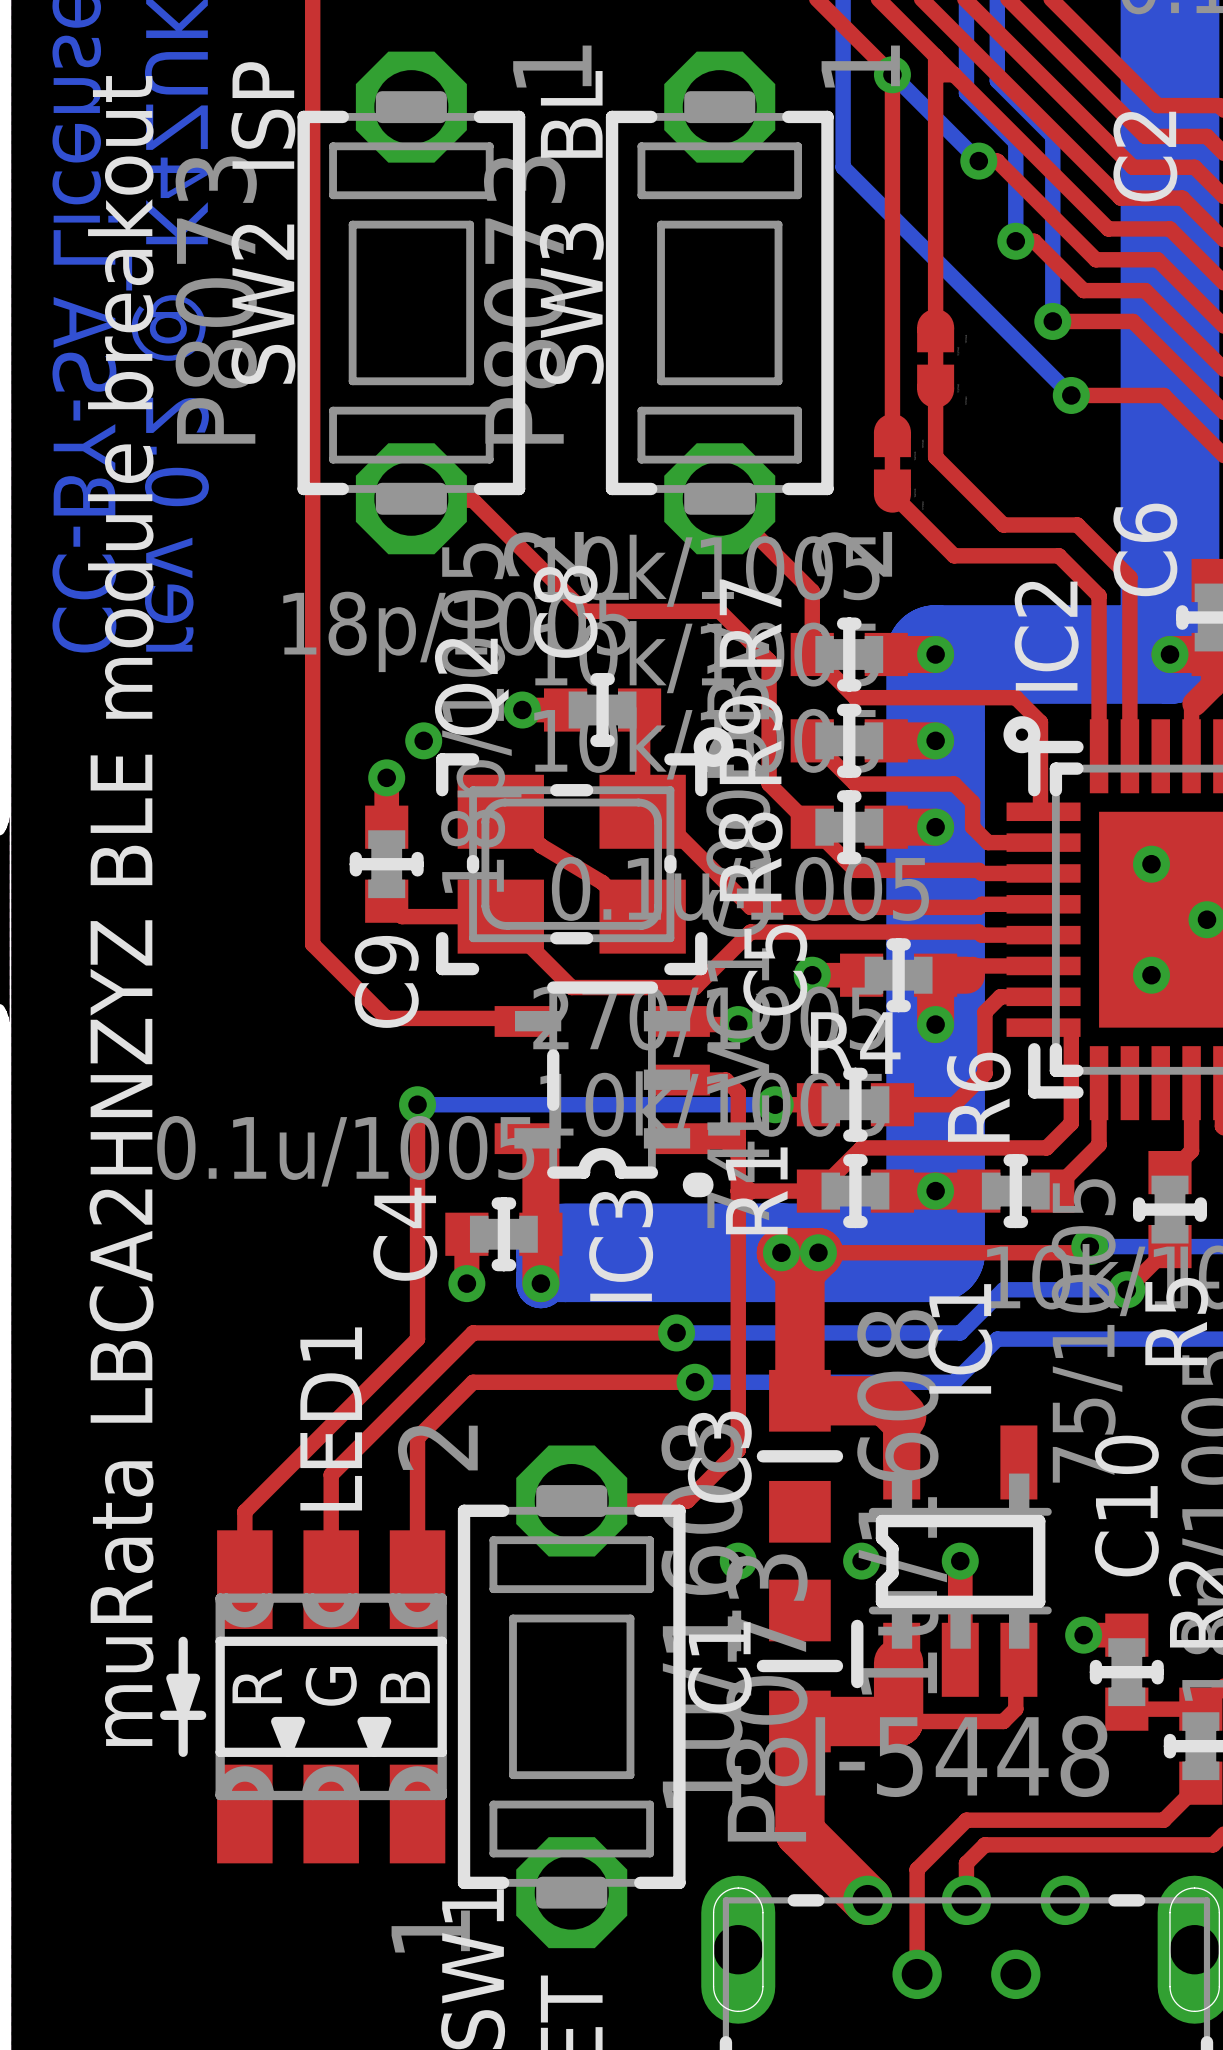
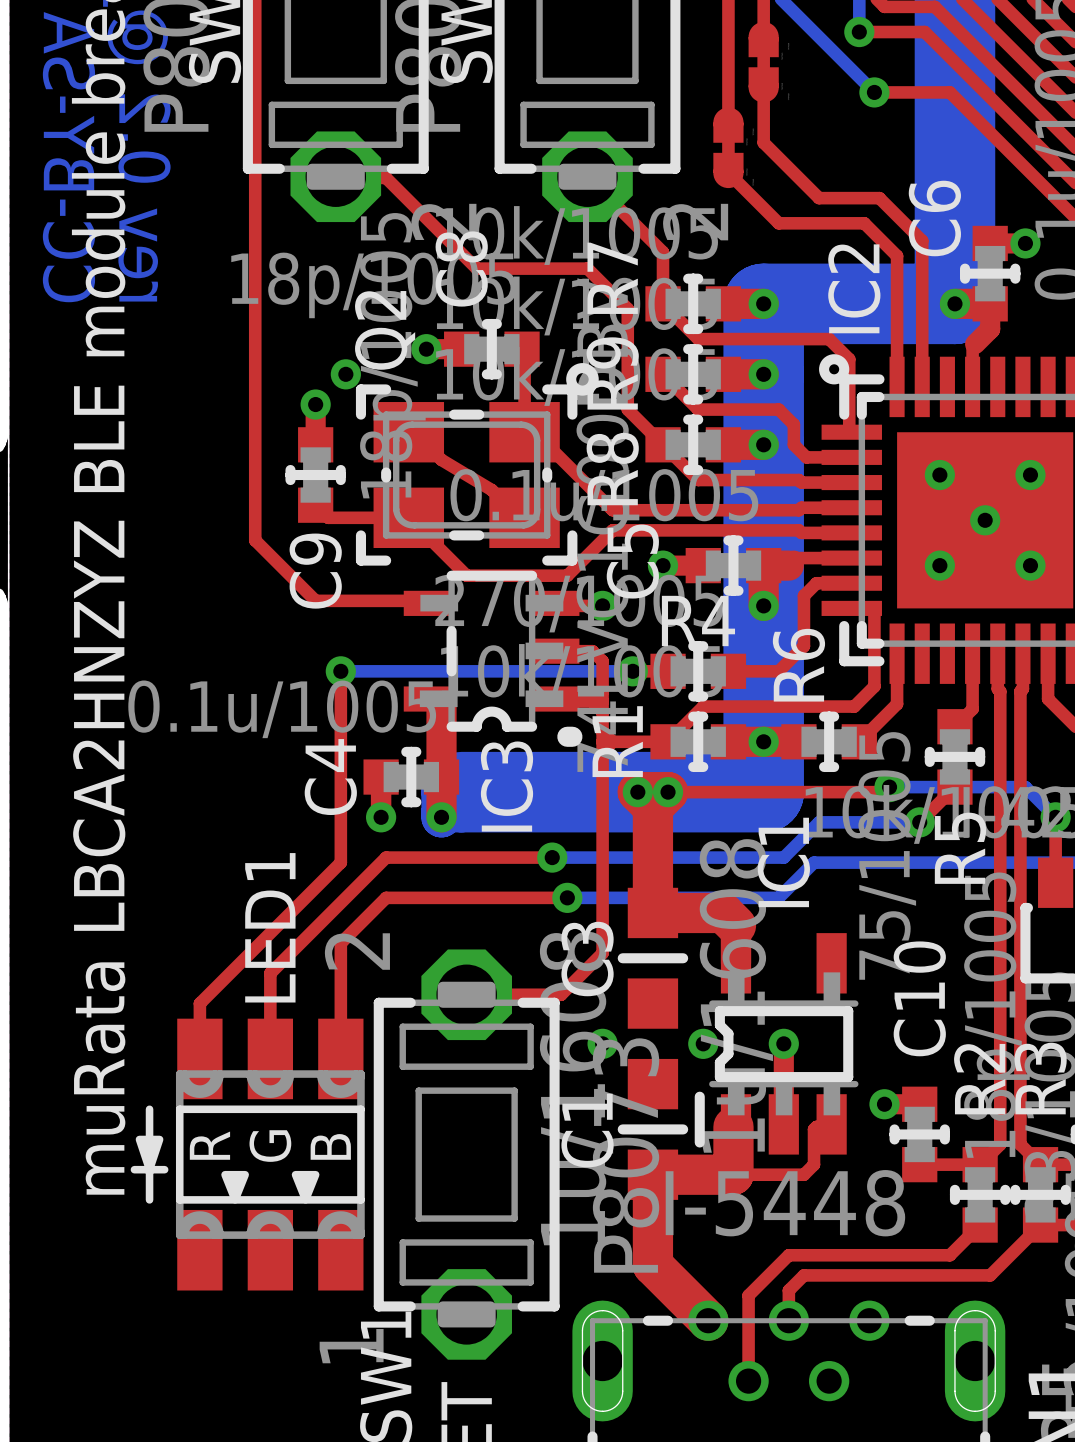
top track: (1018, 1659) (1015, 1665) (1015, 1709) (1003, 1721) (984, 1721) -> (831, 1124) (816, 1126) (814, 1129) (814, 1164) (803, 1174)

